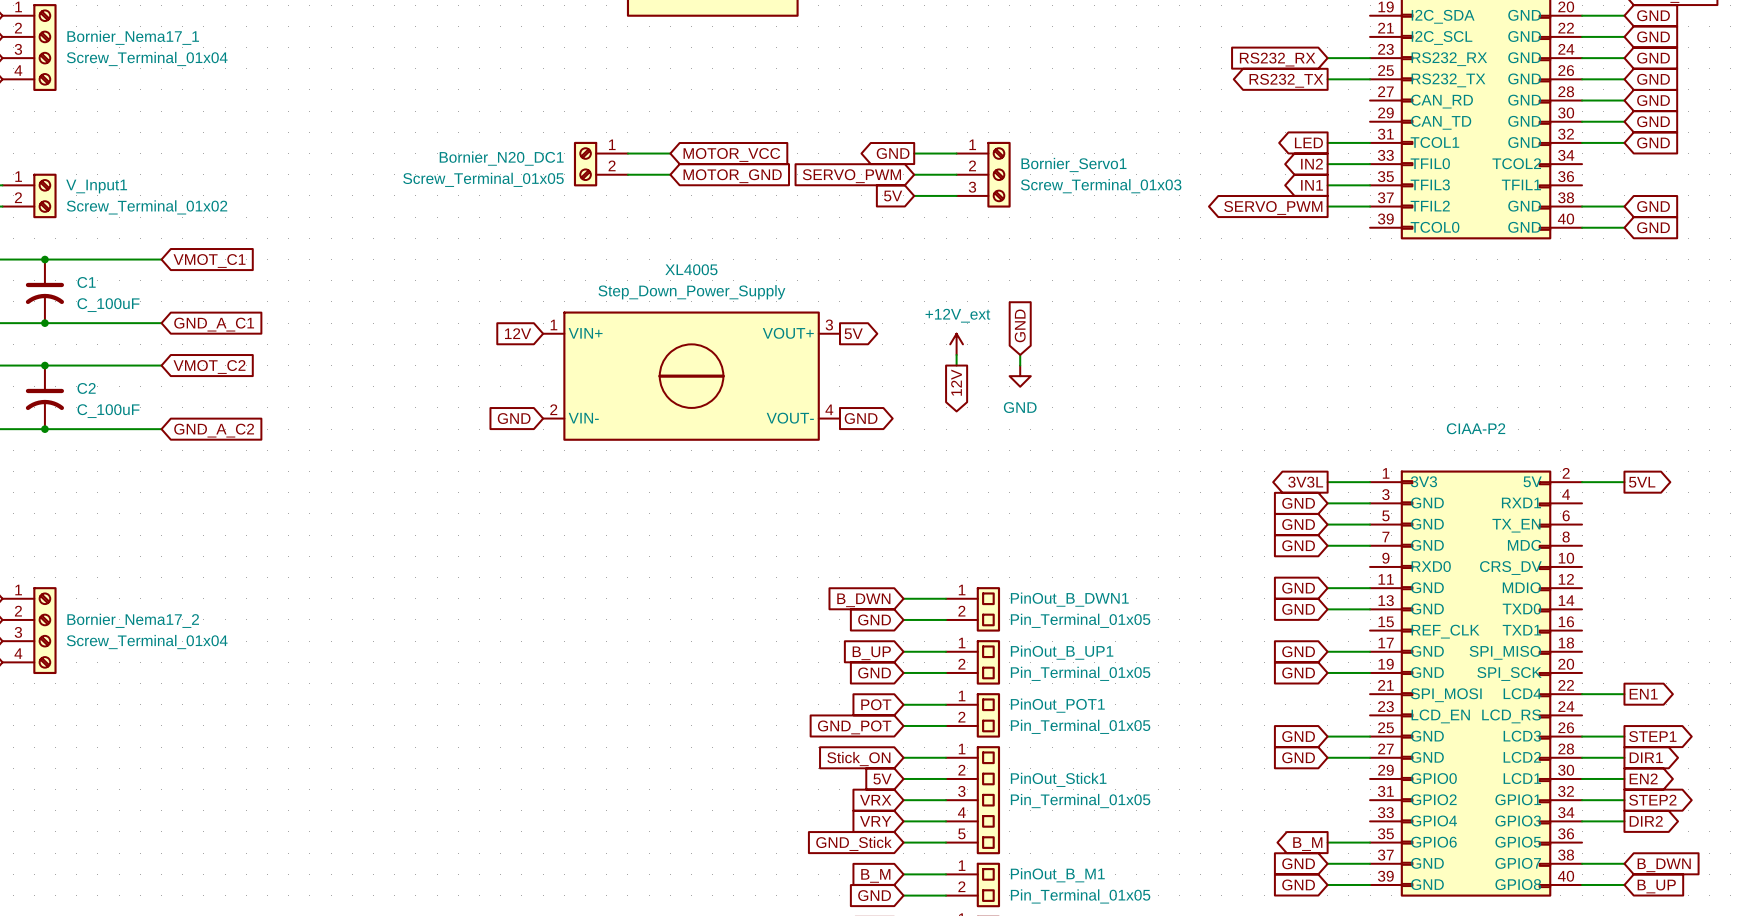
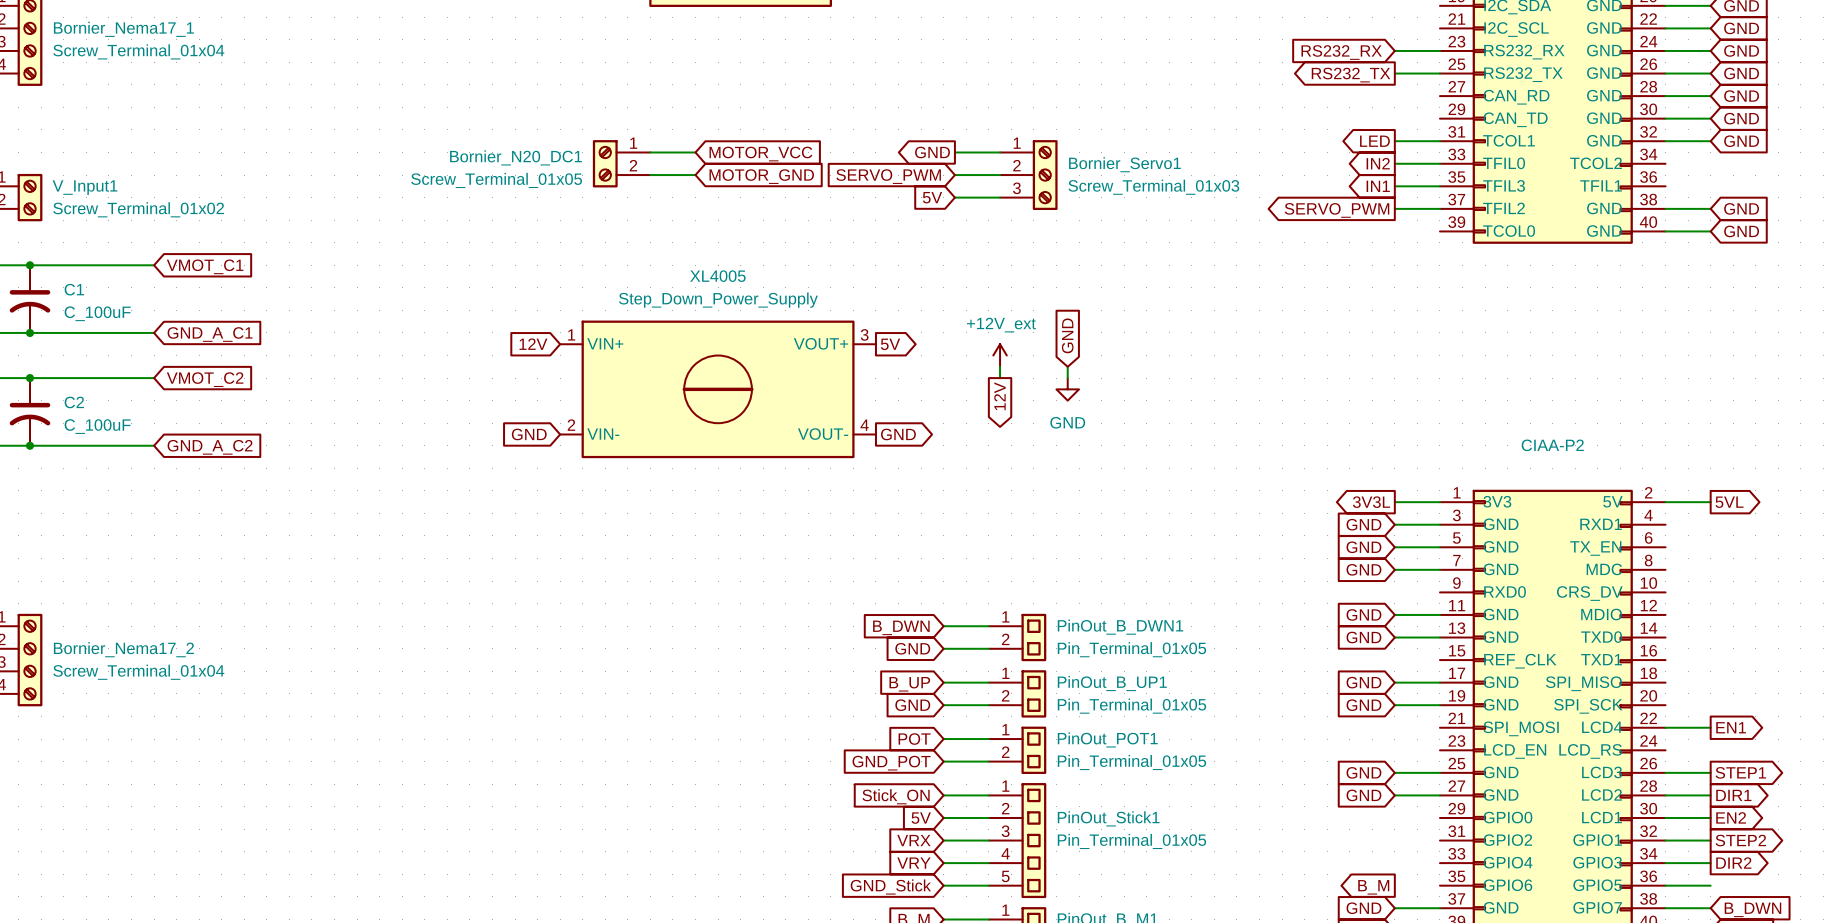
wire: (1327, 842) (1370, 842) -> none
wire: none -> (1665, 885) (1710, 885)

